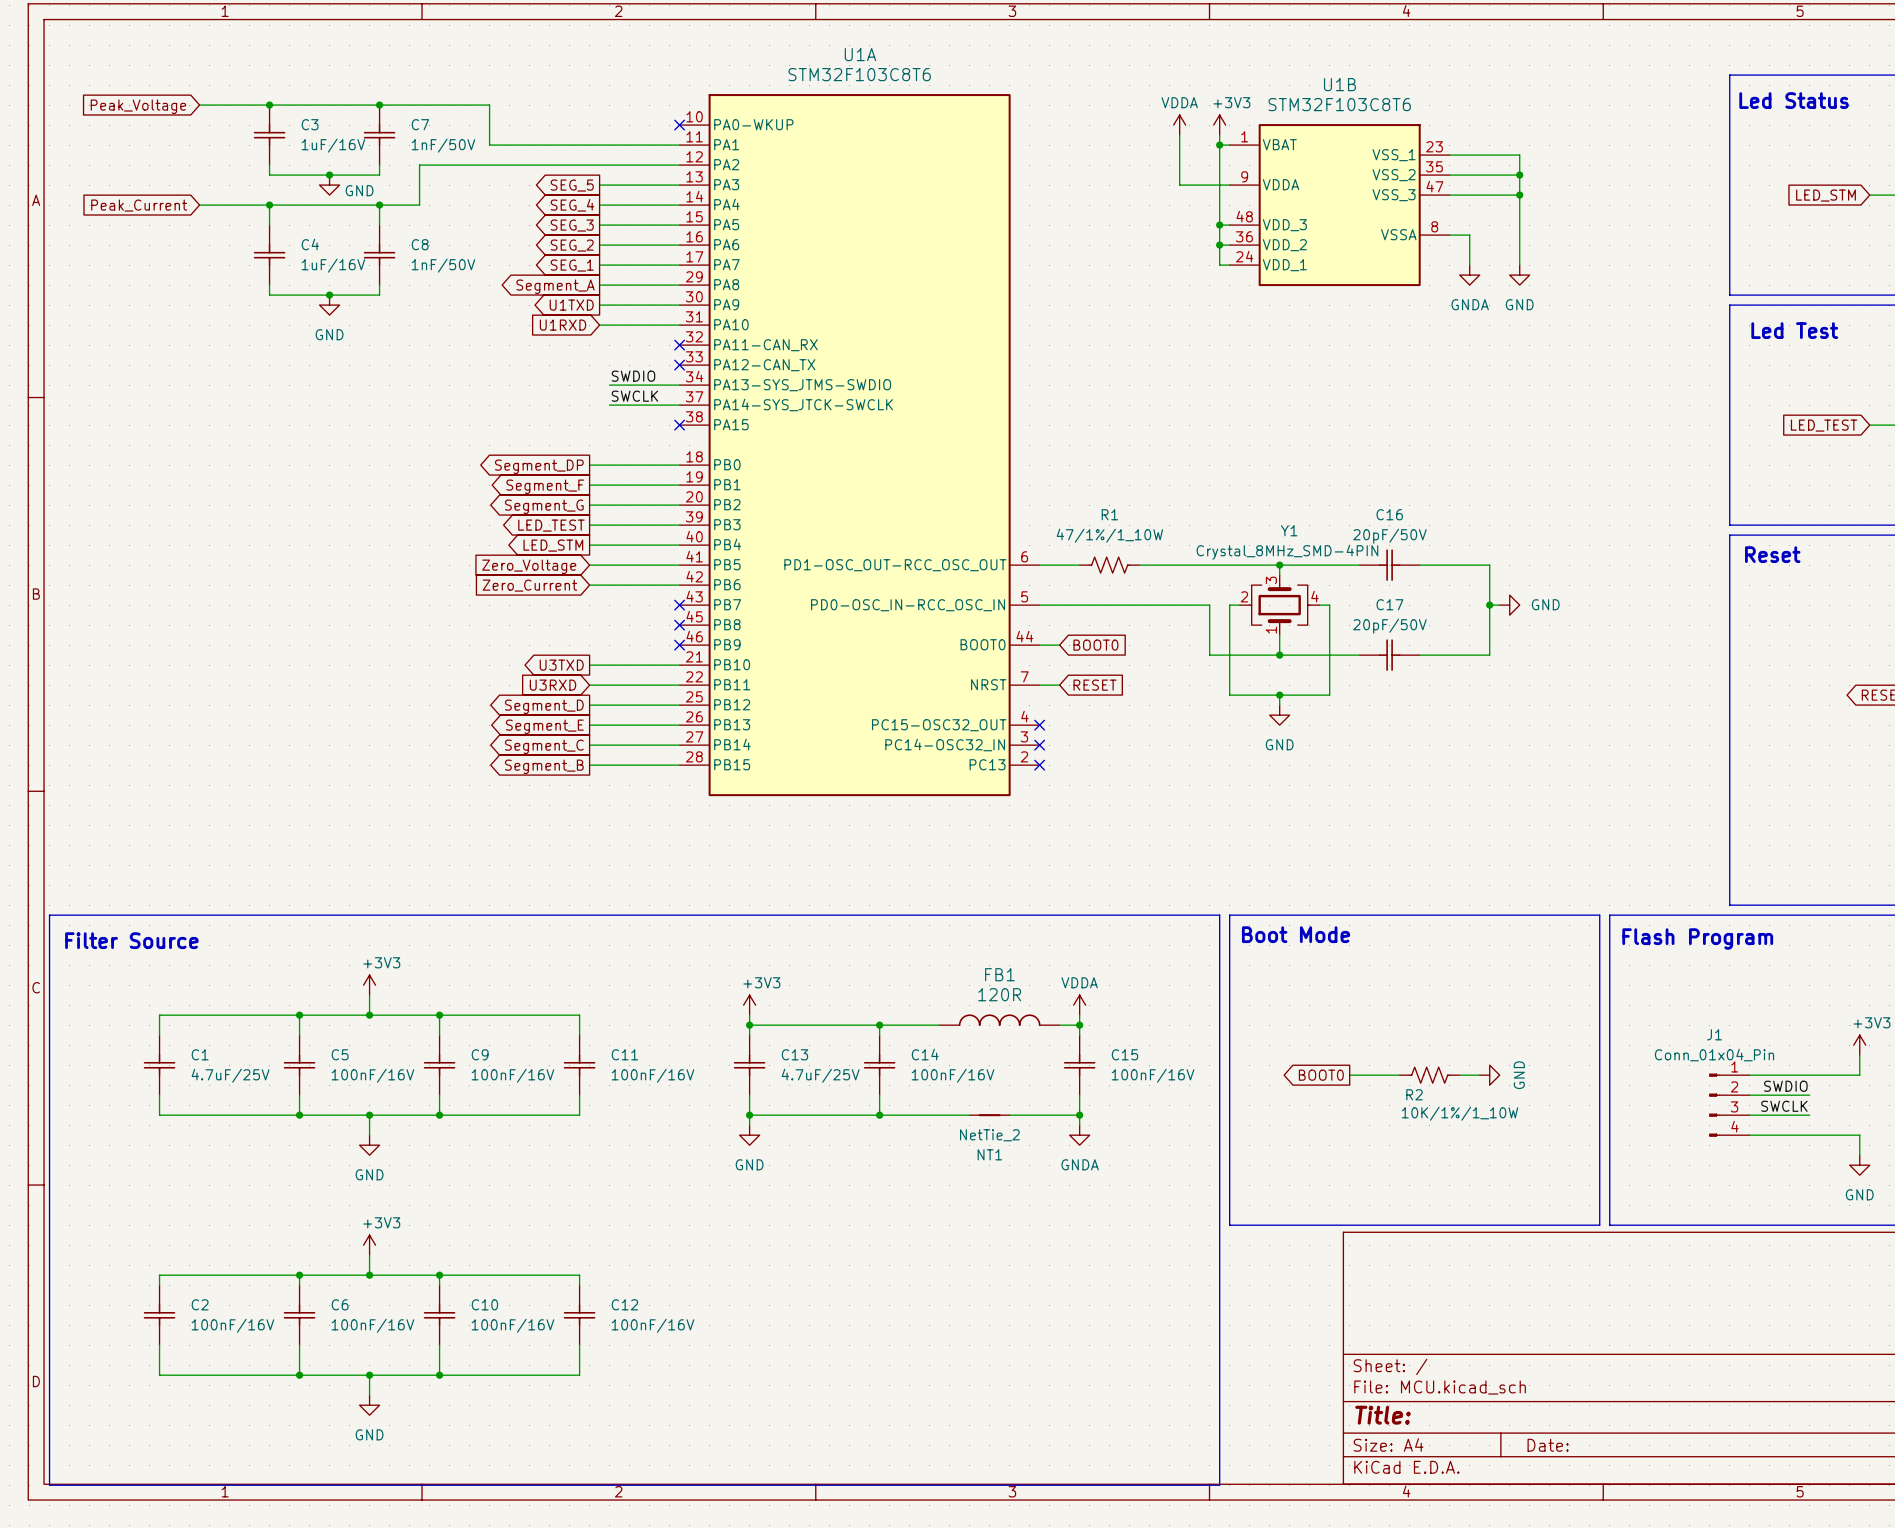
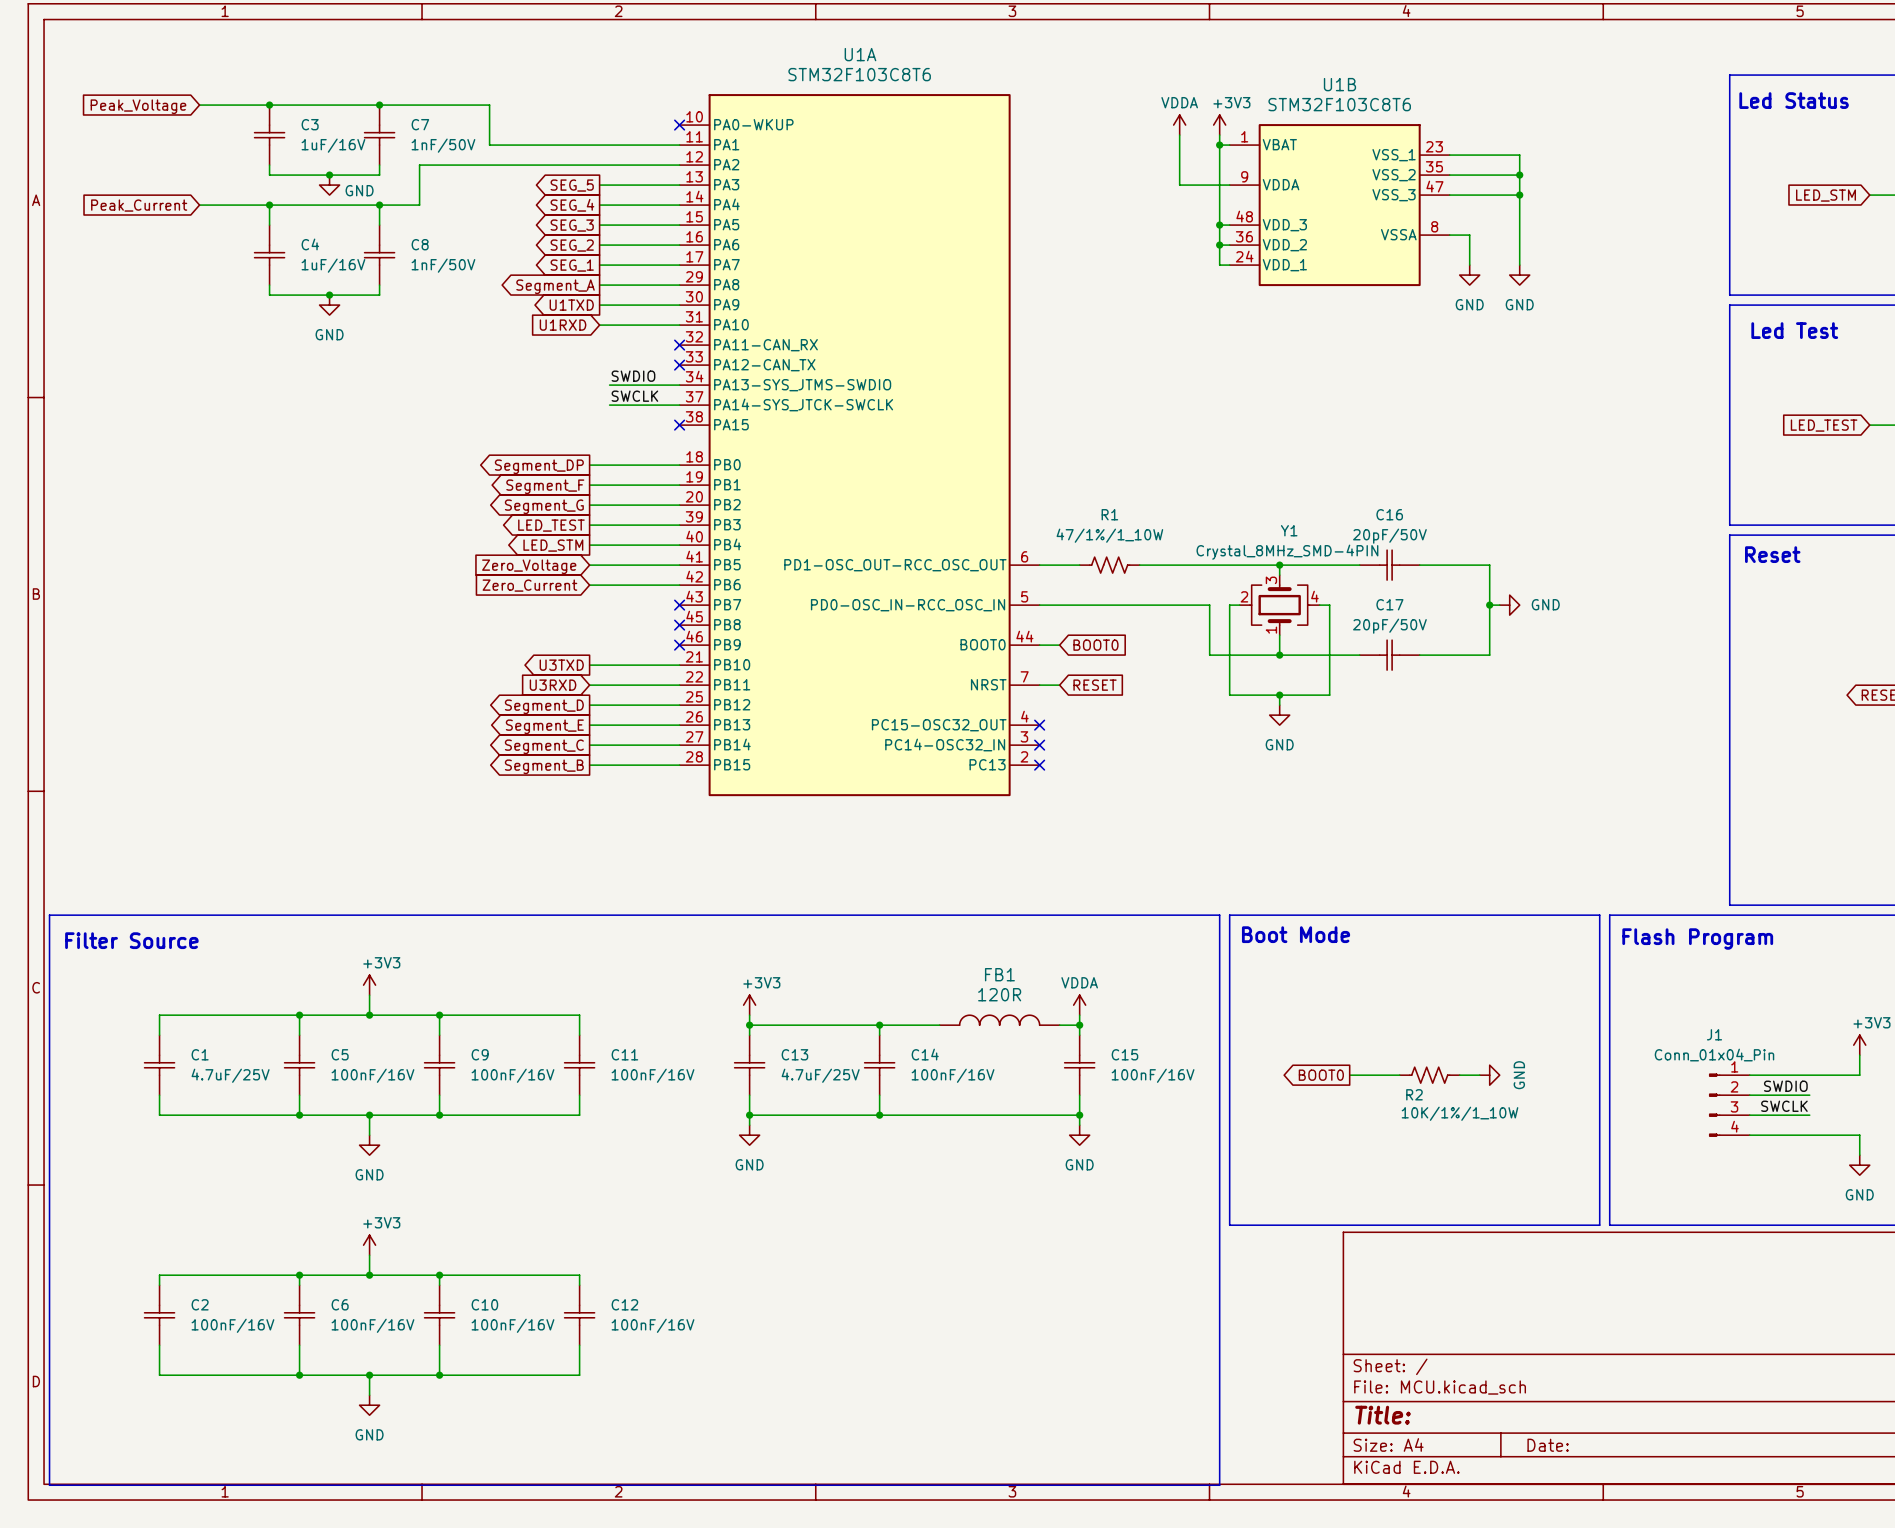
power symbol: GNDA (1469, 275) -> GND (1469, 275)
NT1: NetTie_2 (989, 1115) -> none
power symbol: GNDA (1079, 1135) -> GND (1079, 1135)

